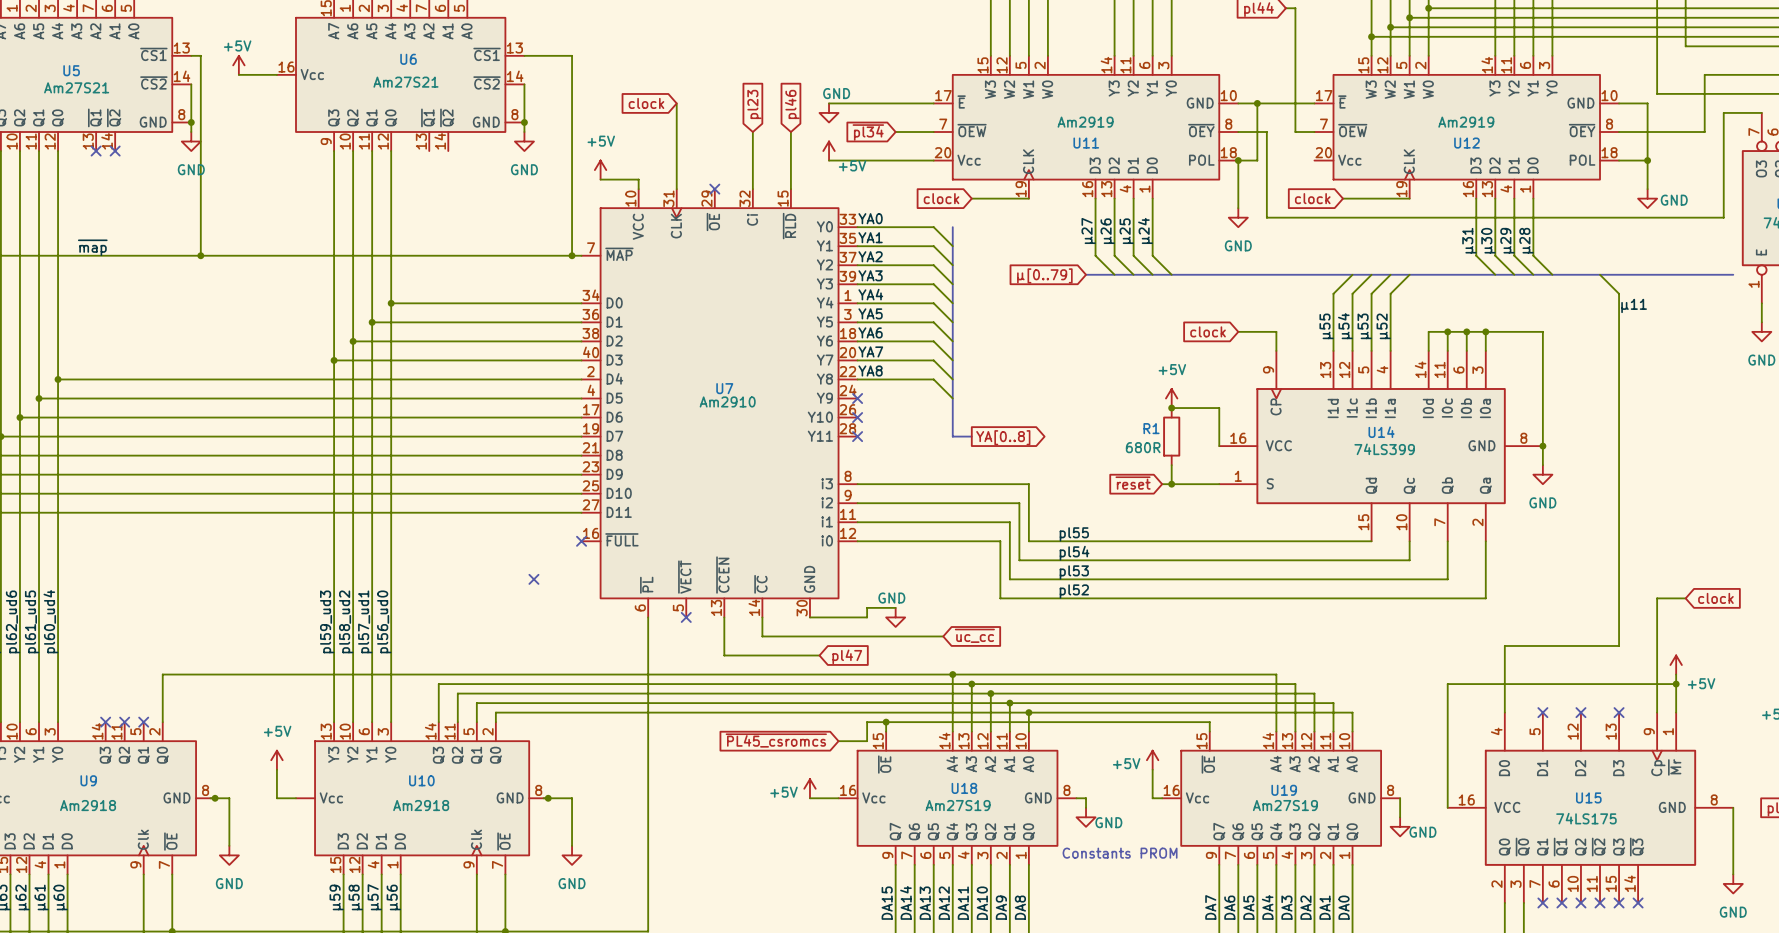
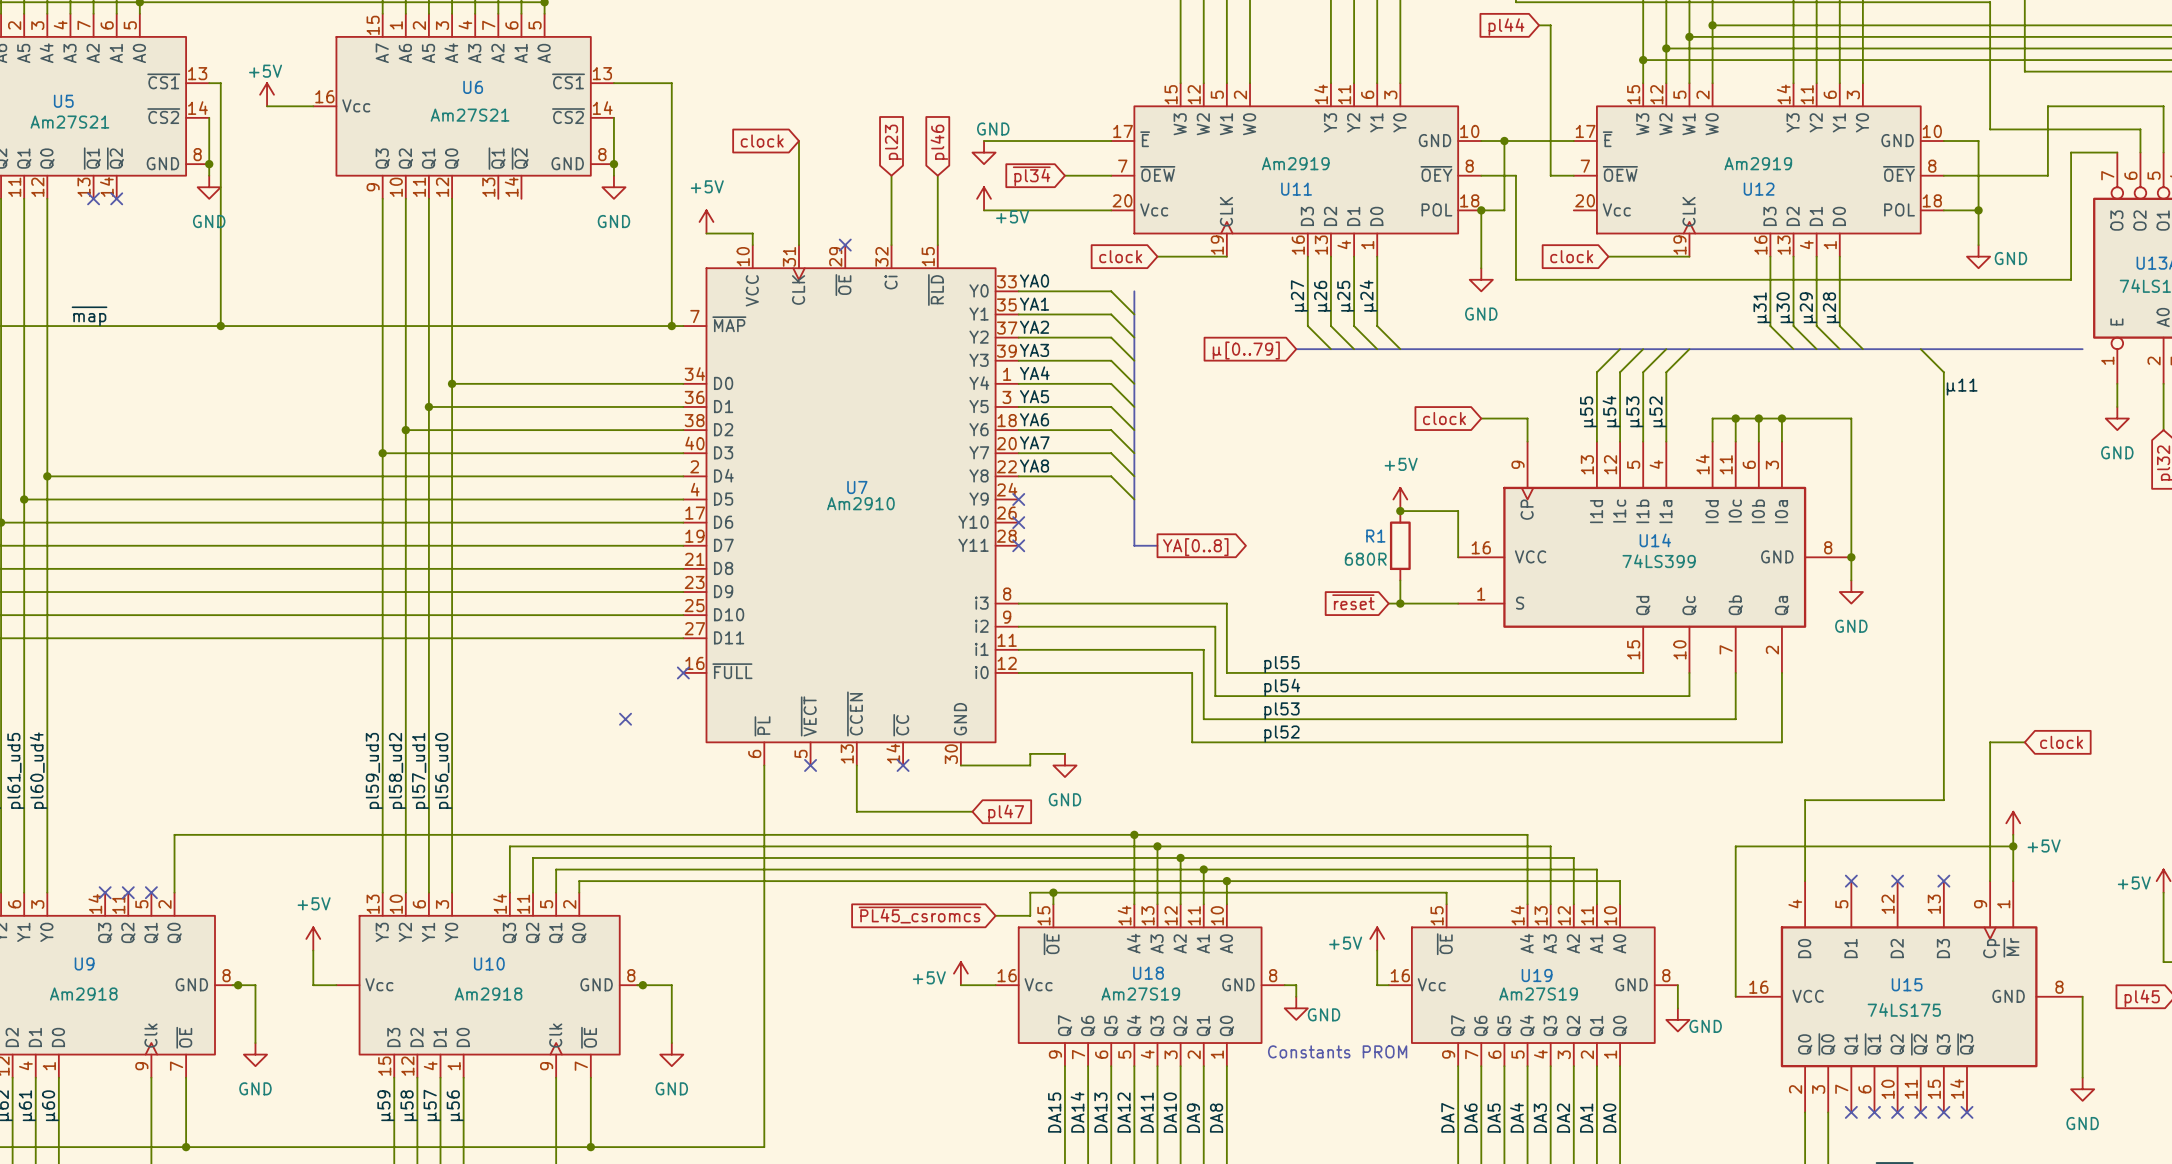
power symbol text position: GND (891, 598) -> GND (1064, 799)
wire: (762, 617) (762, 636) (943, 636) -> none
no-connect mark: none -> (903, 765)
global label: ~{uc_cc} (974, 635) -> none

